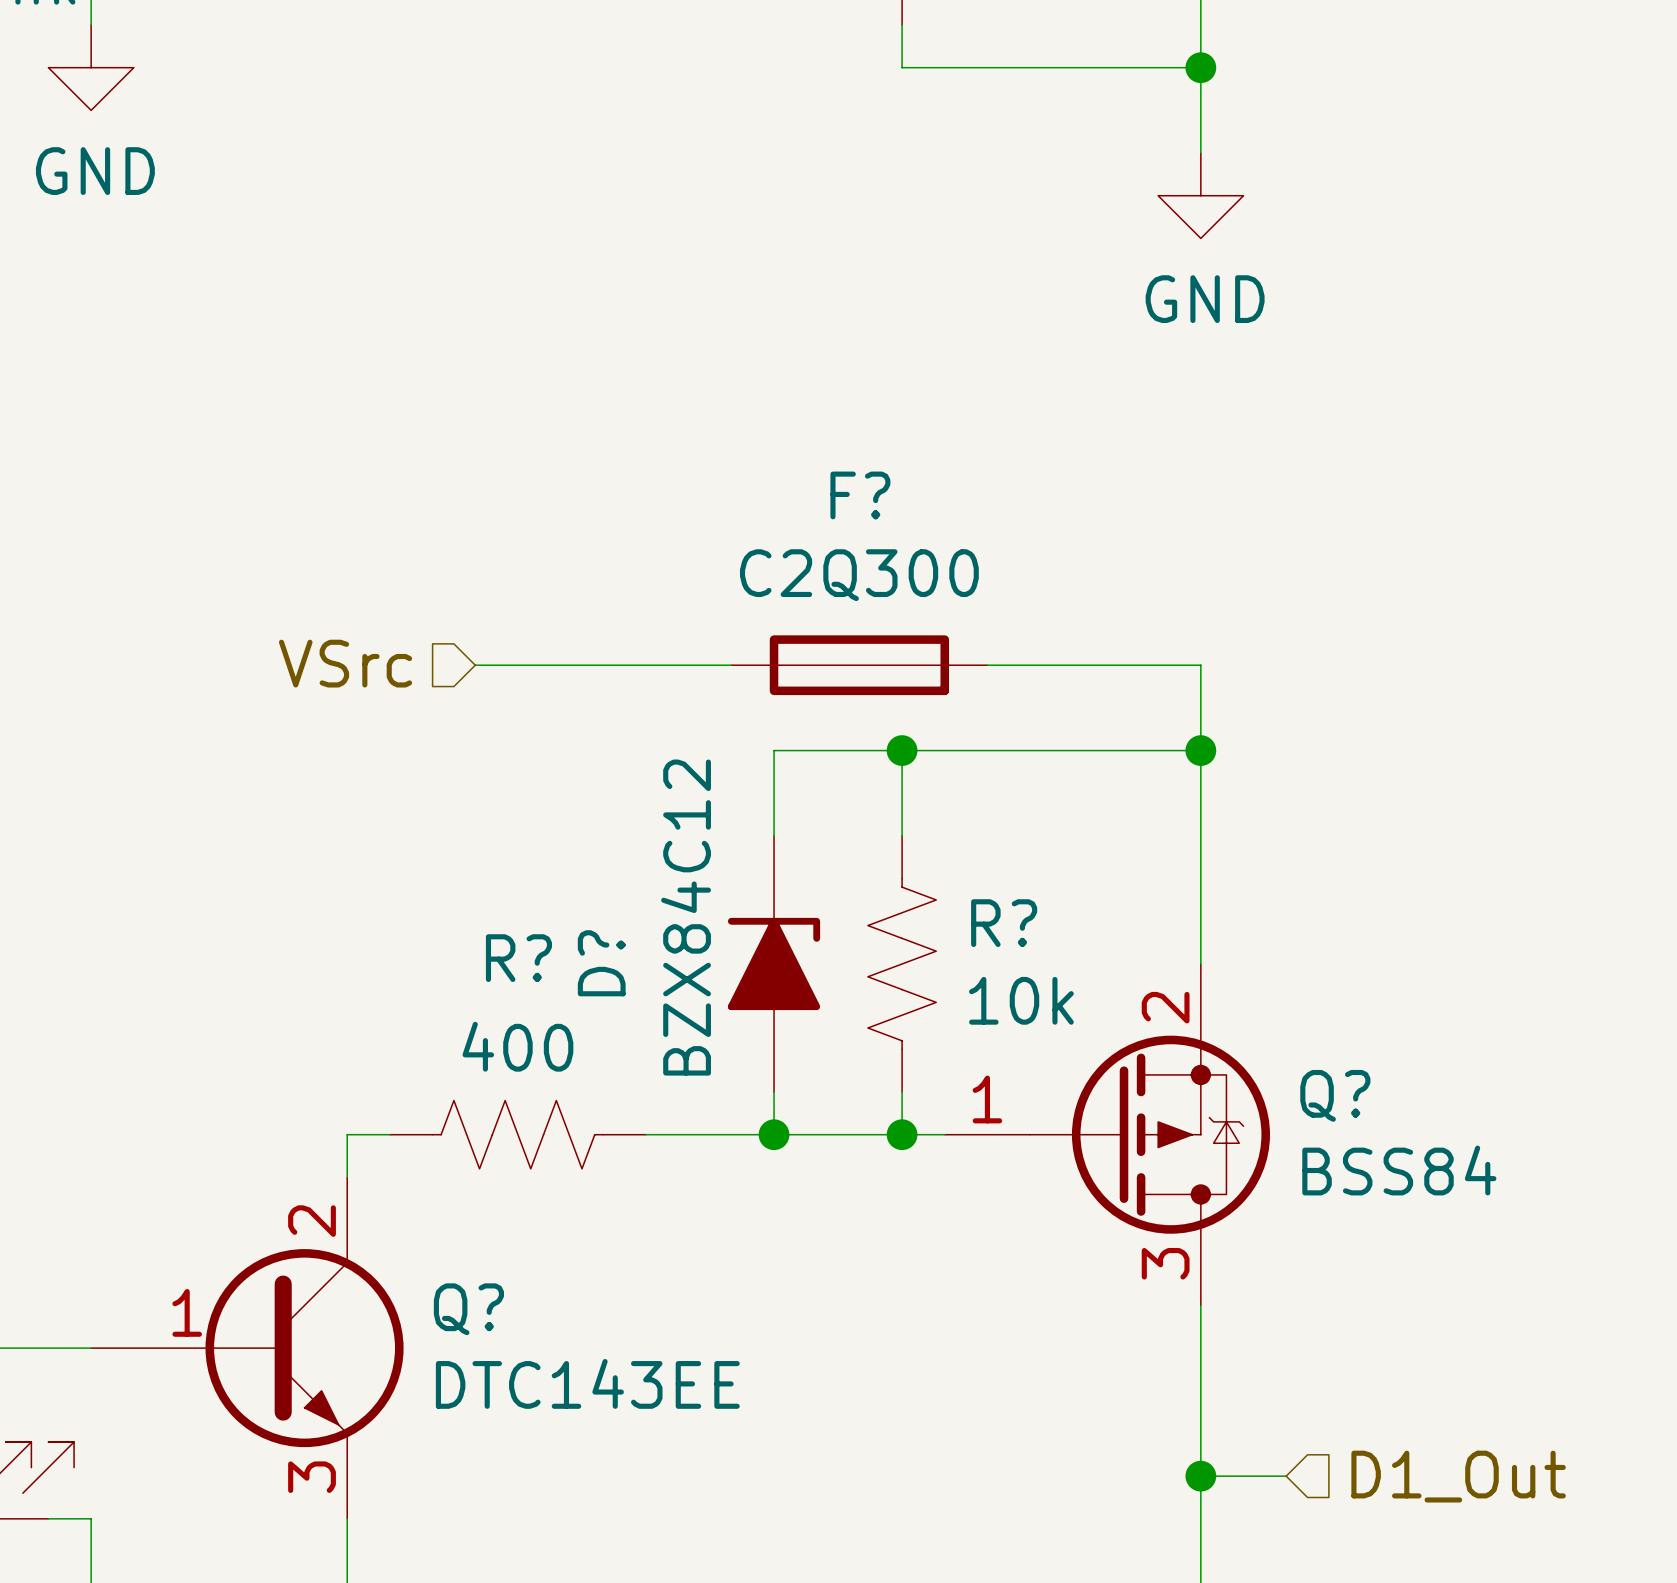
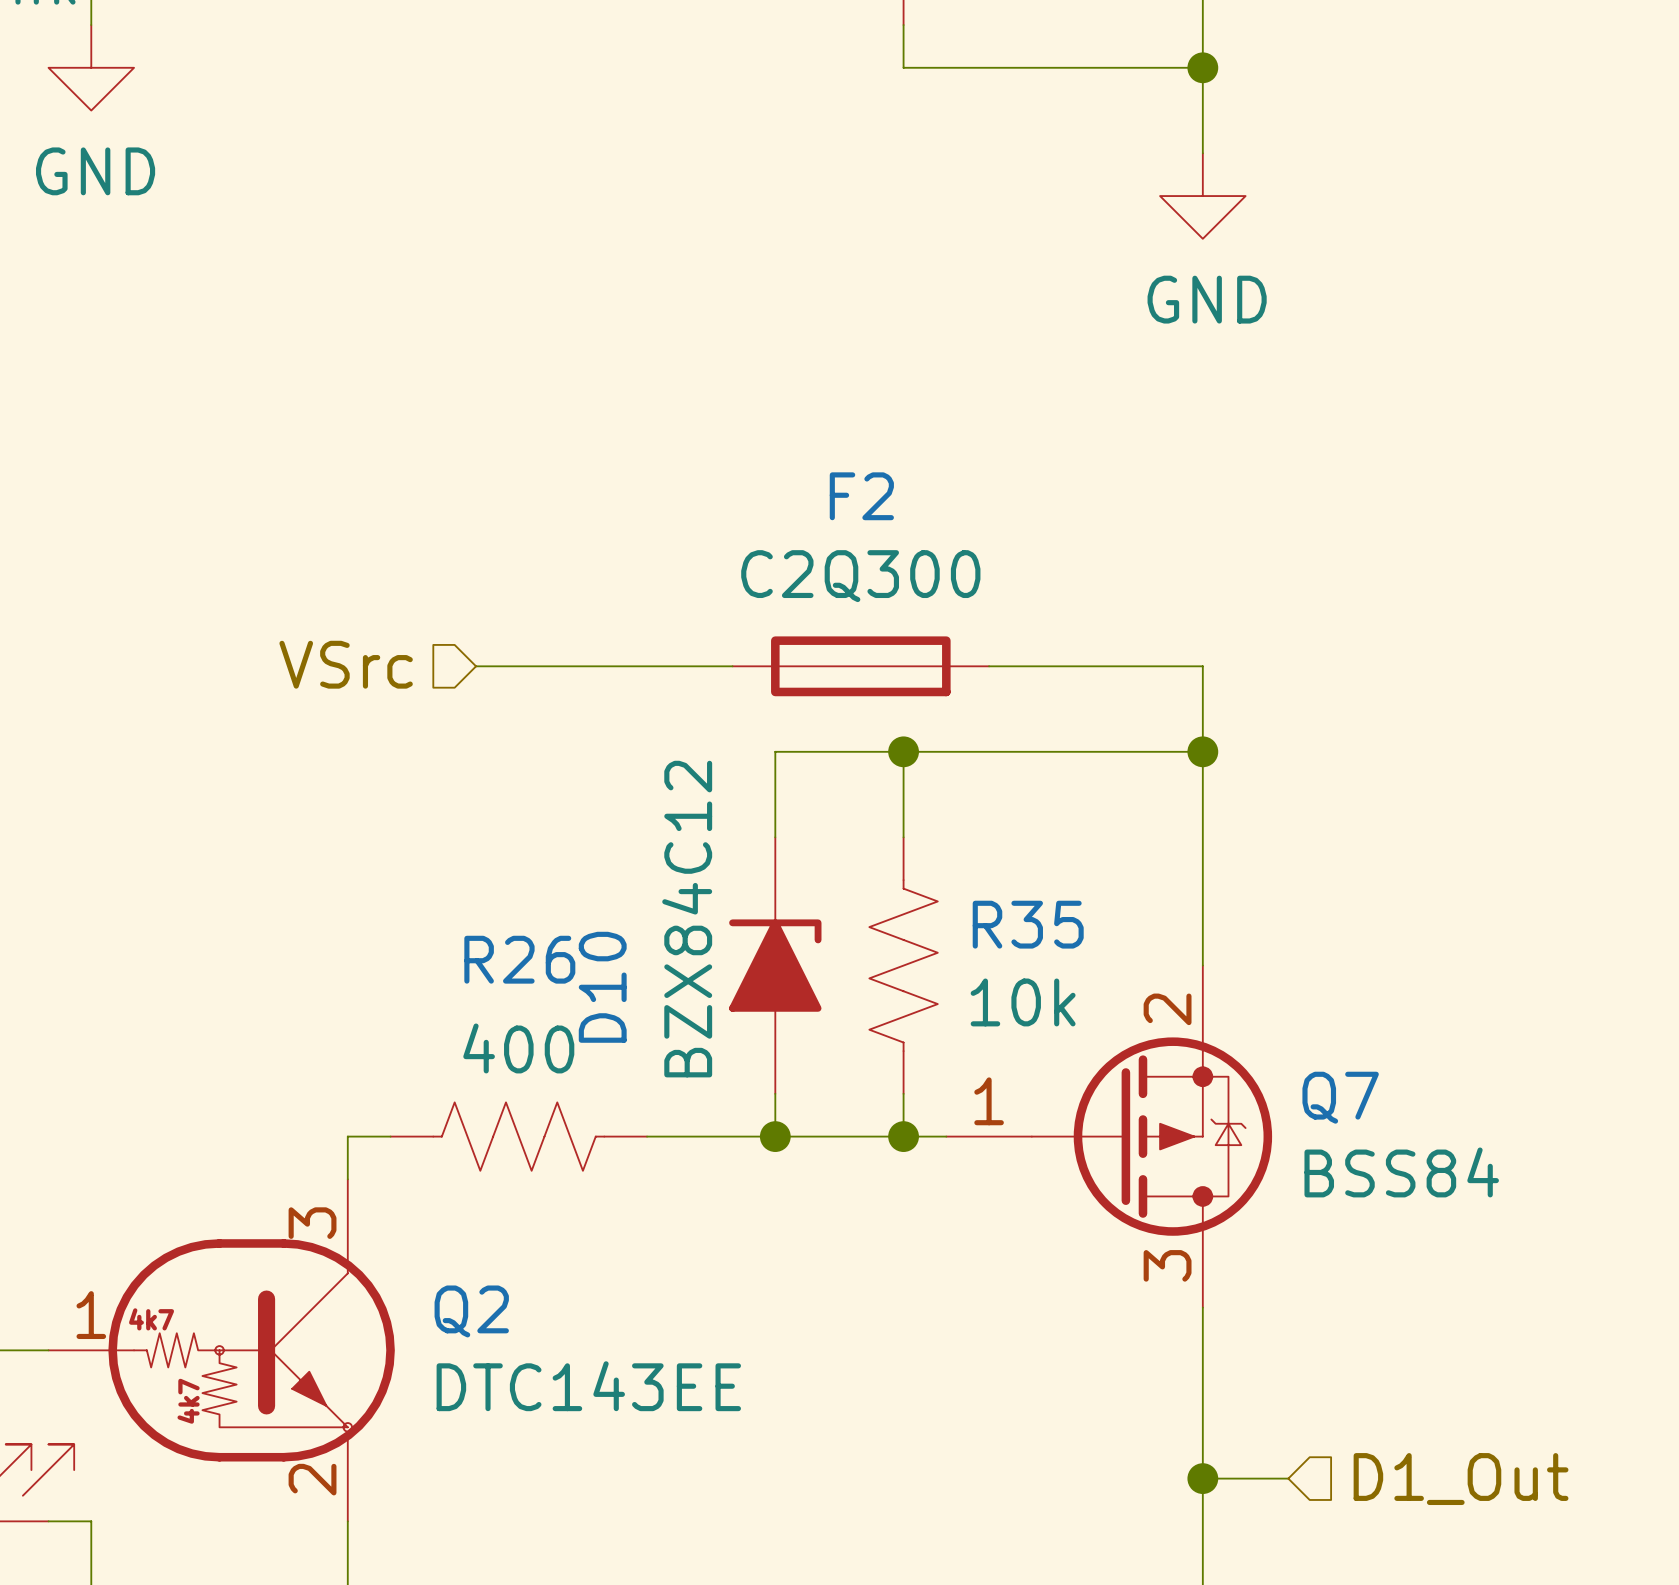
F? name: F? (860, 495) -> F2 (861, 496)
R? name: R? (1004, 923) -> R35 (1028, 924)
R? name: R? (518, 958) -> R26 (519, 959)
D? name: D? (601, 963) -> D10 (602, 987)
Q? name: Q? (1335, 1095) -> Q7 (1340, 1097)
Q2: none -> DTC143EE (221, 1350)
Q?: DTC143EE (247, 1348) -> none

